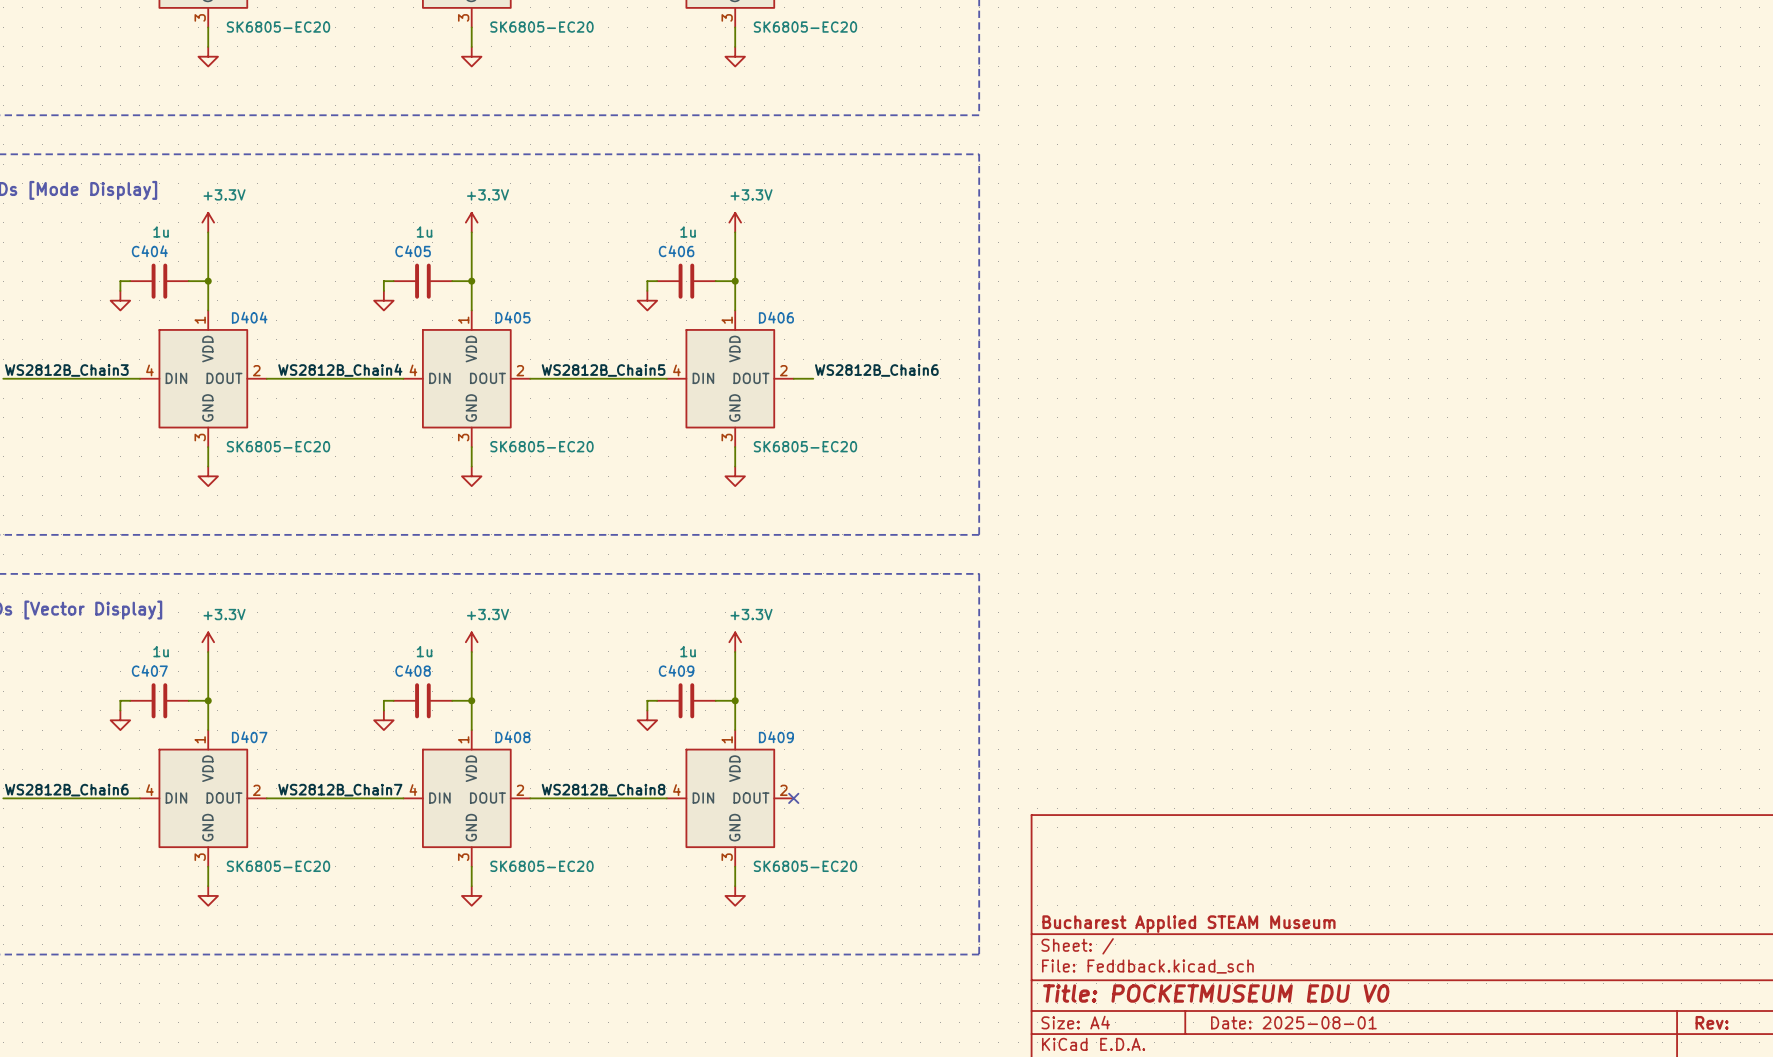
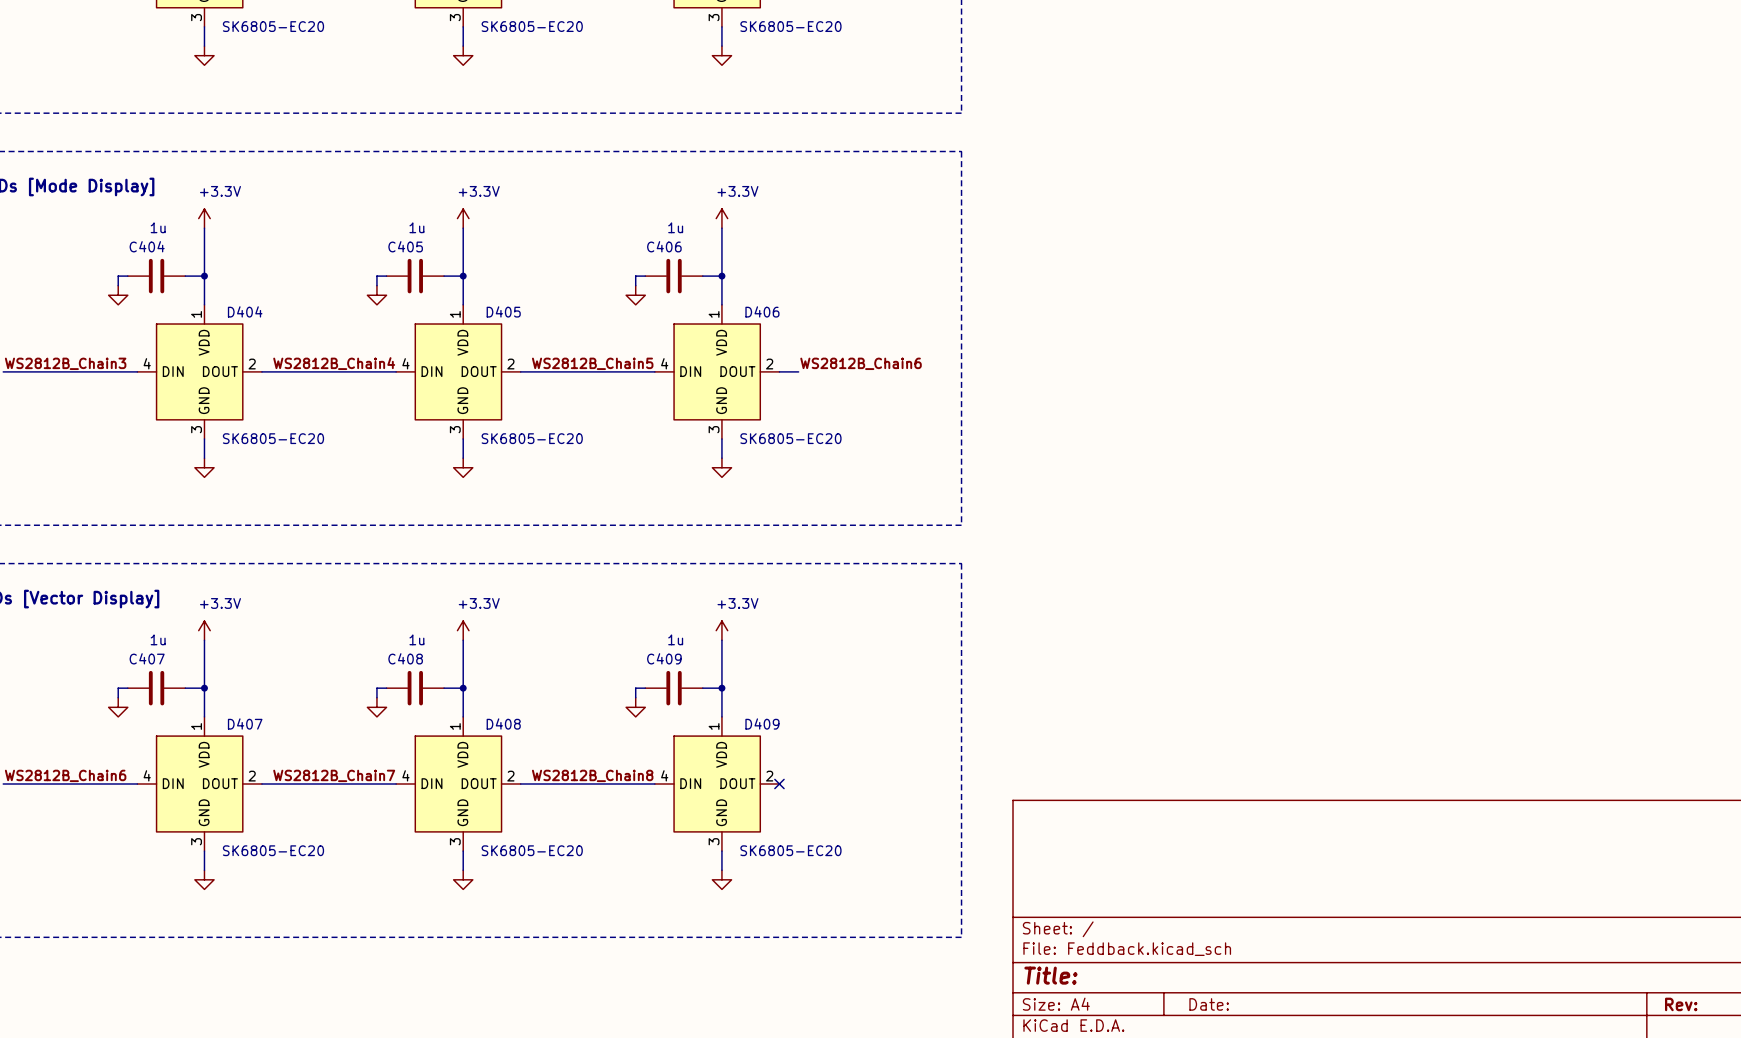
title block: Bucharest Applied STEAM Museum (1188, 924) -> none
title block: Title: POCKETMUSEUM EDU V0 (1216, 993) -> Title: (1050, 975)
title block: Date: 2025-08-01 (1293, 1022) -> Date: (1209, 1004)

